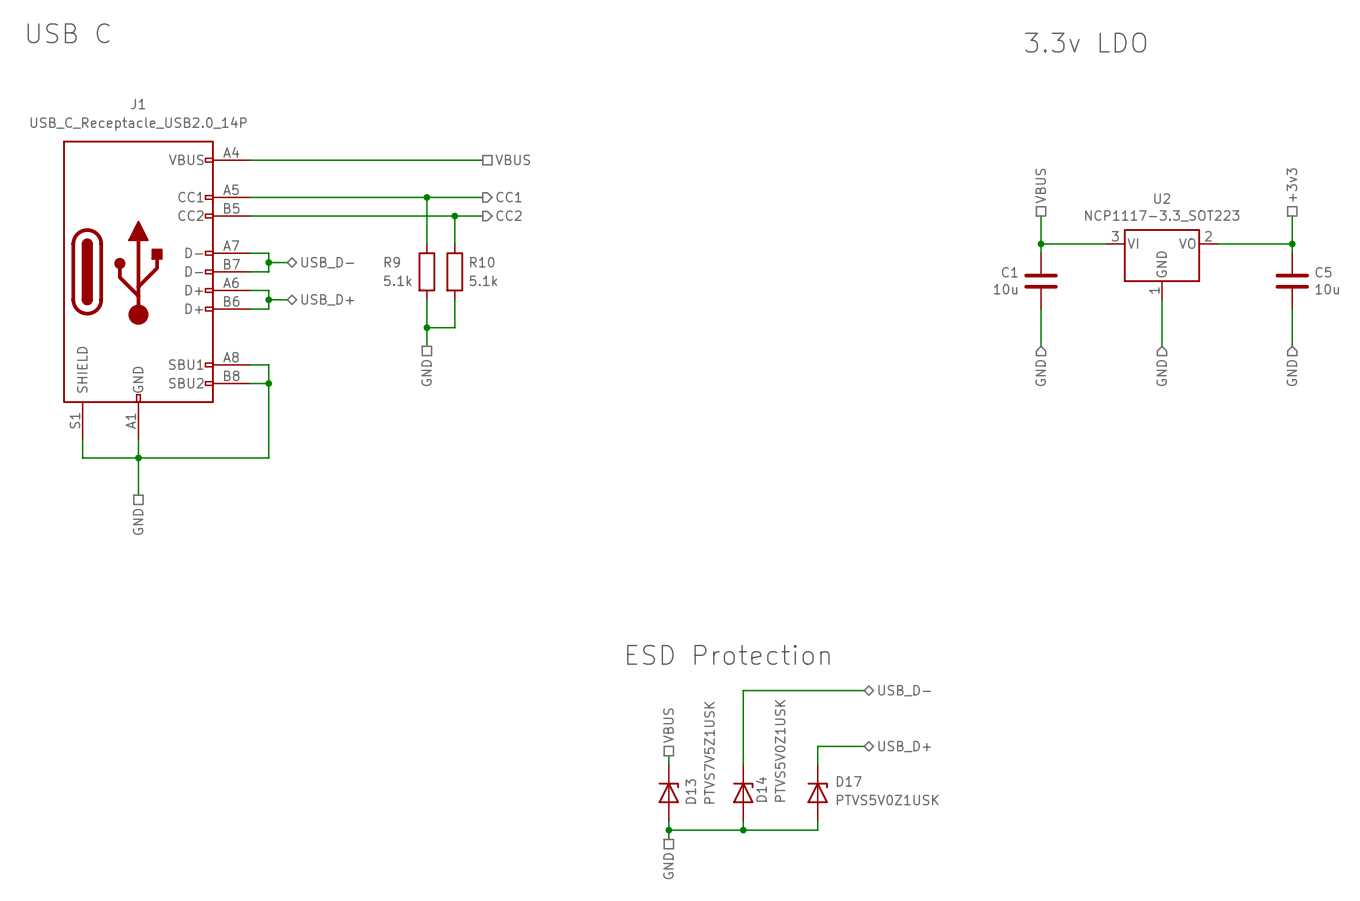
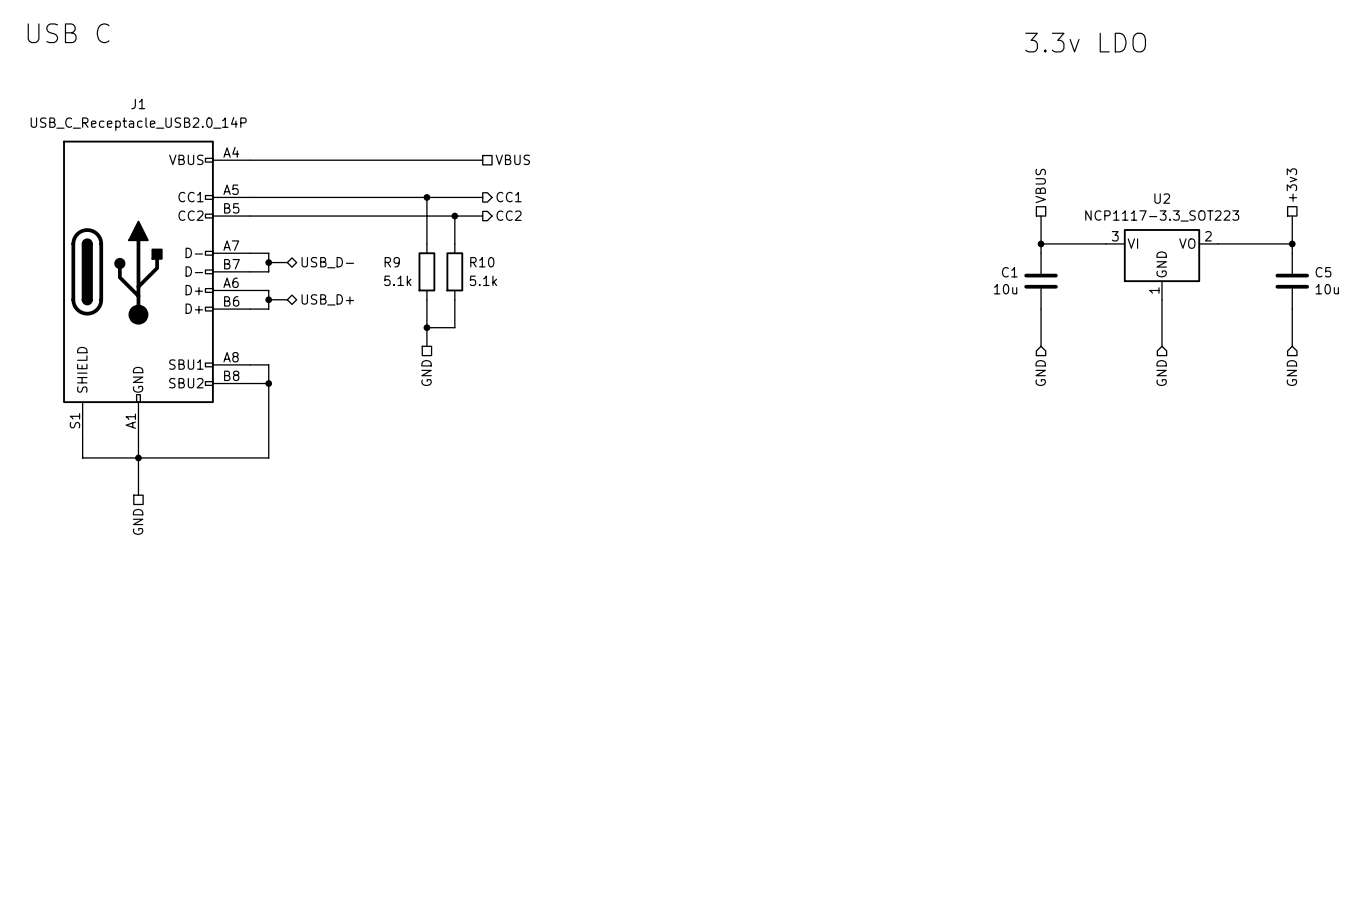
text: ESD Protection (728, 654) -> none
wire: (864, 690) (743, 690) (743, 765) -> none
hierarchical label: USB_D- (904, 690) -> none
hierarchical label: VBUS (668, 725) -> none
wire: (864, 746) (817, 746) (817, 765) -> none
hierarchical label: USB_D+ (904, 746) -> none
wire: (668, 755) (668, 765) -> none
D13: PTVS7V5Z1USK (668, 792) -> none
D14: PTVS5V0Z1USK (743, 792) -> none
D17: PTVS5V0Z1USK (817, 792) -> none
wire: (668, 820) (668, 839) -> none
wire: (743, 820) (743, 830) -> none
wire: (817, 820) (817, 830) (668, 830) -> none
junction: (668, 830) -> none
junction: (743, 830) -> none
hierarchical label: GND (668, 866) -> none

